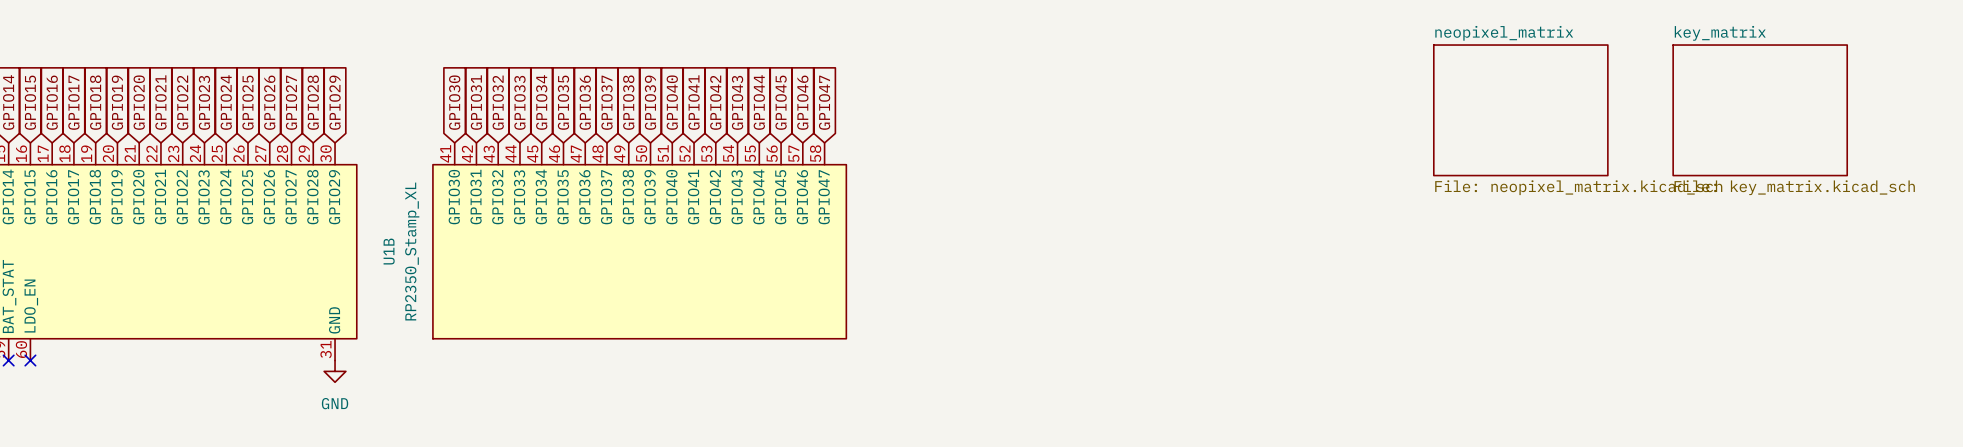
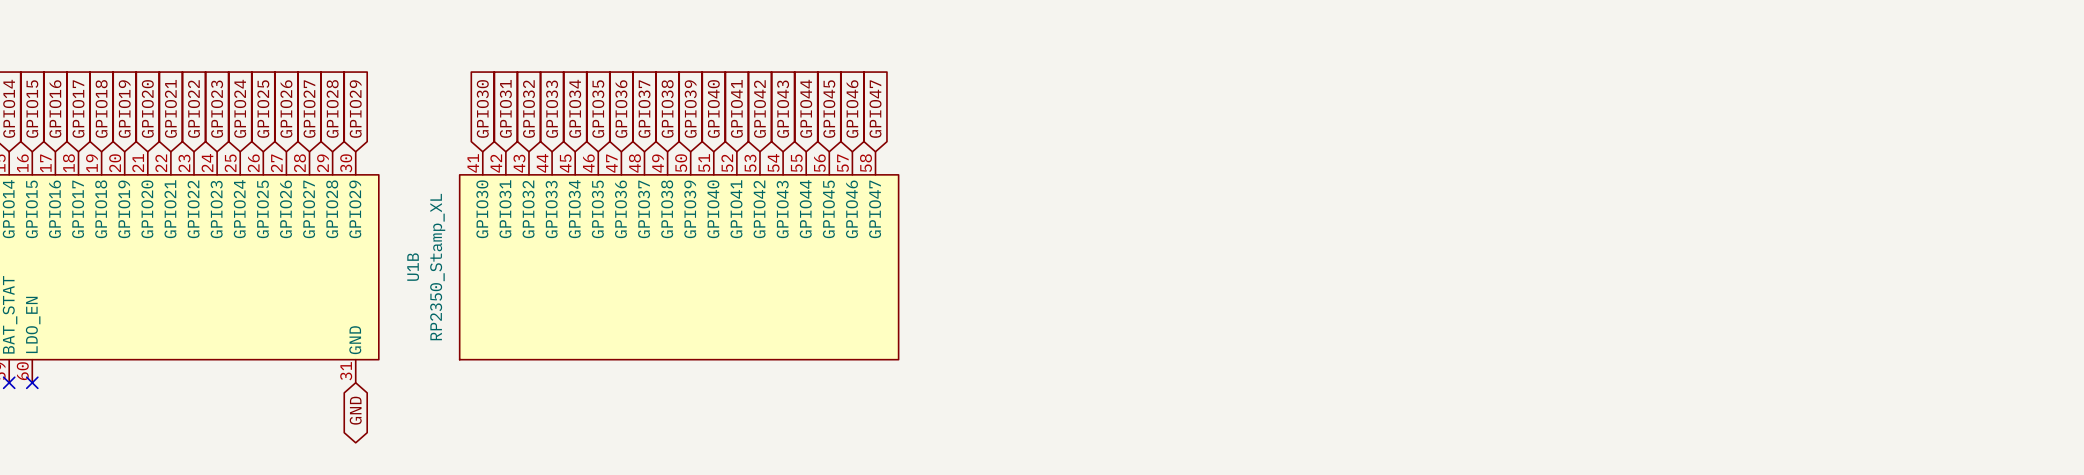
sheet neopixel_matrix: File: neopixel_matrix.kicad_sch (1520, 110) -> none
sheet key_matrix: File: key_matrix.kicad_sch (1760, 110) -> none
power symbol: GND (335, 371) -> none
global label: none -> GND (355, 410)

